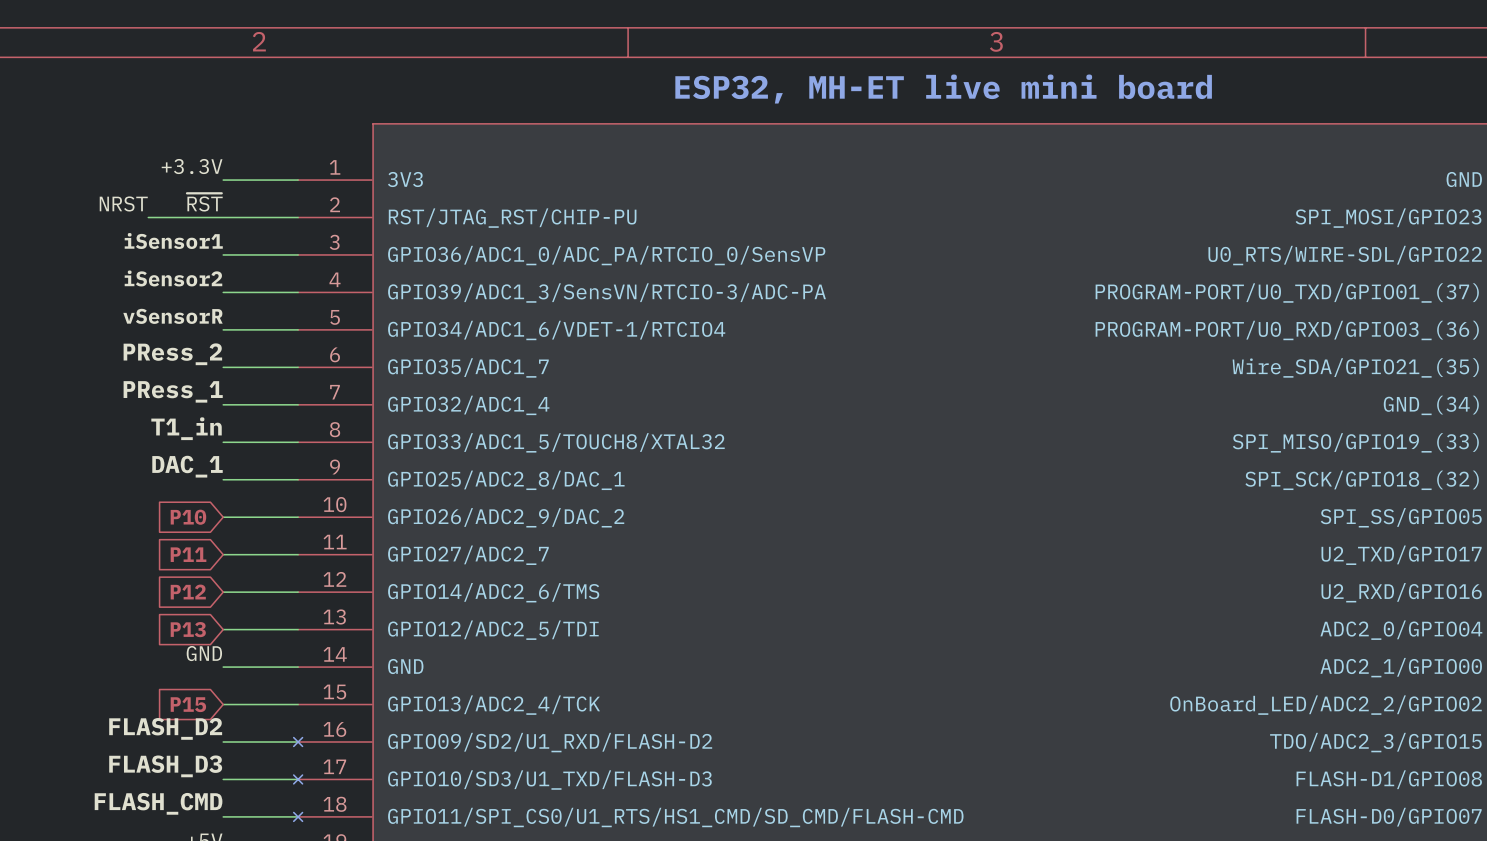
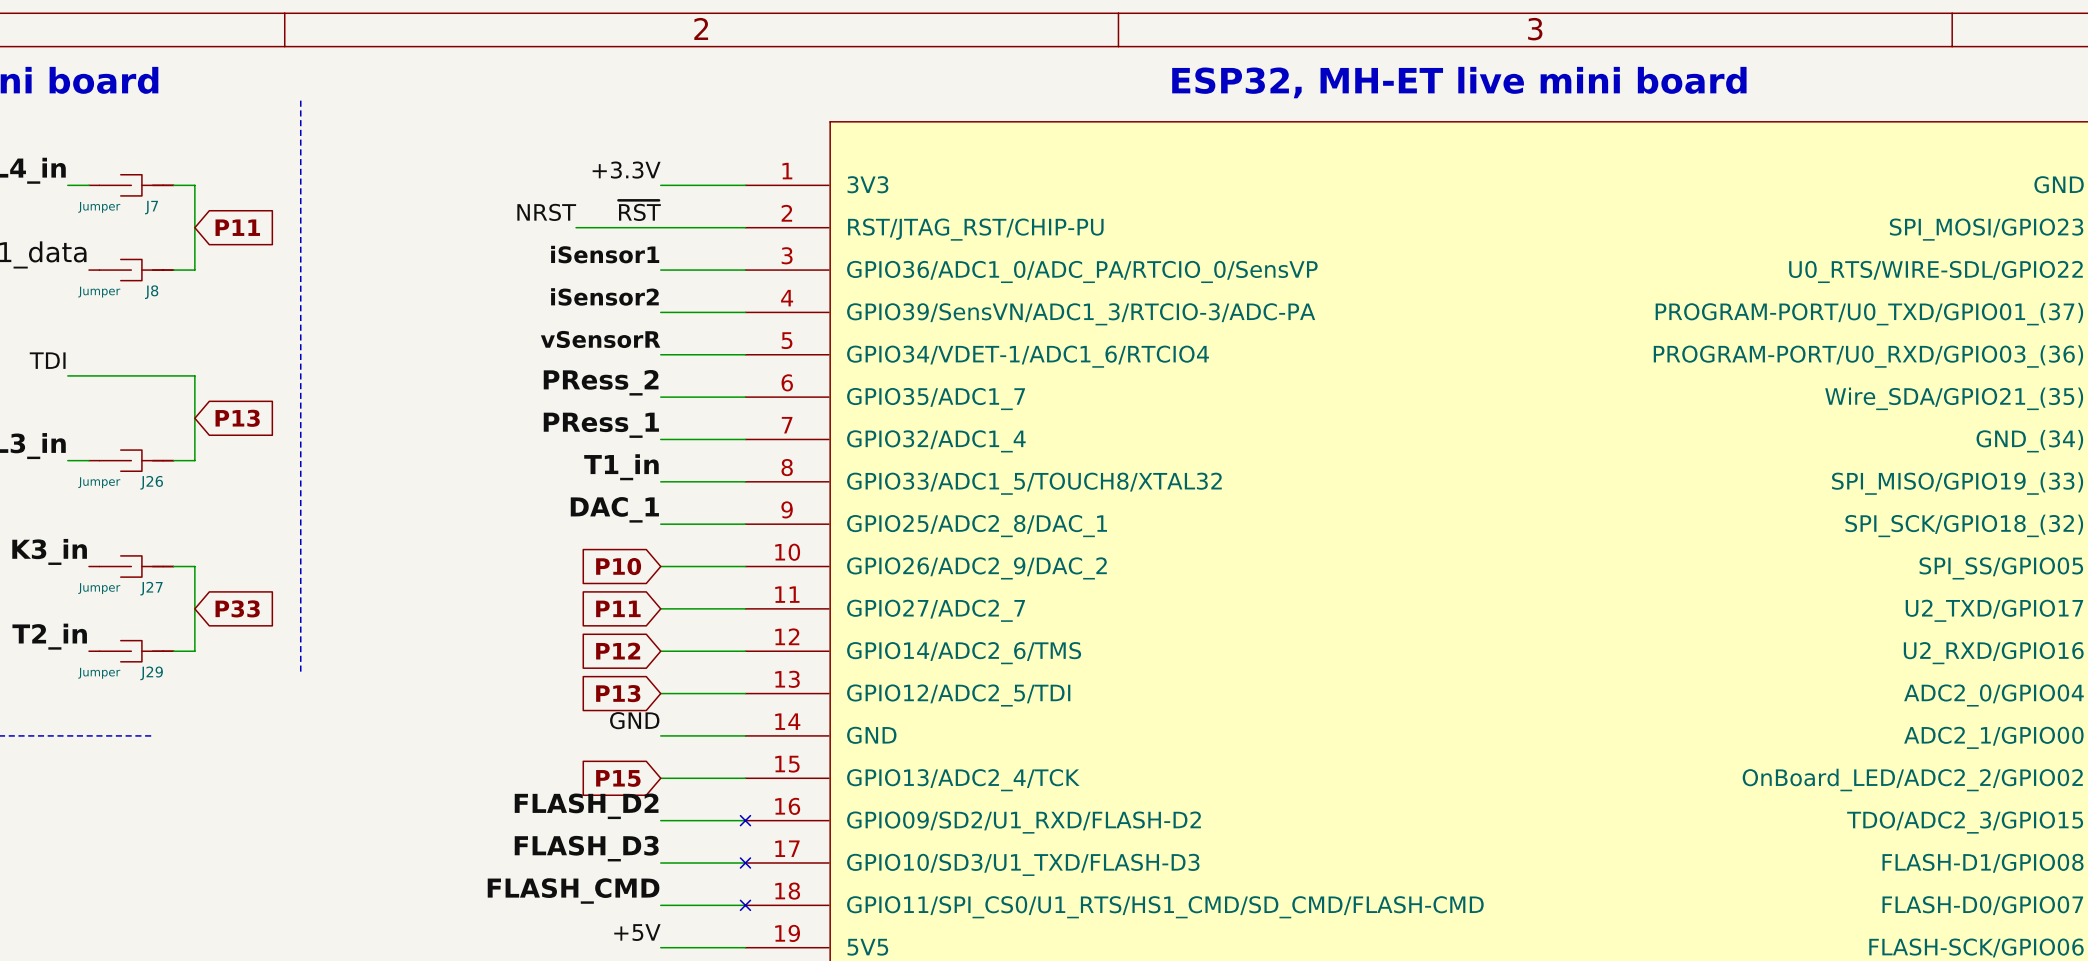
part pin name: GPIO39/ADC1_3/SensVN/RTCIO-3/ADC-PA (606, 293) -> GPIO39/SensVN/ADC1_3/RTCIO-3/ADC-PA (1081, 314)
part pin name: GPIO34/ADC1_6/VDET-1/RTCIO4 (556, 330) -> GPIO34/VDET-1/ADC1_6/RTCIO4 (1028, 356)

